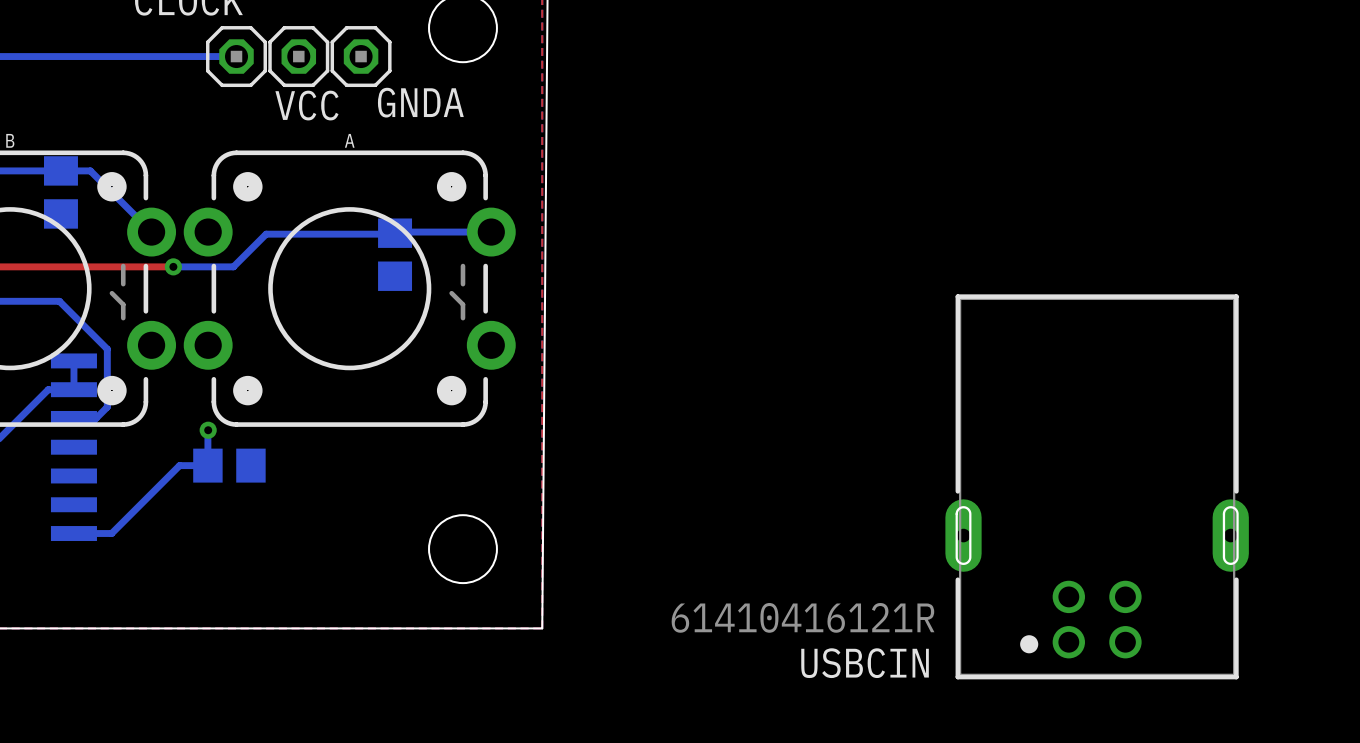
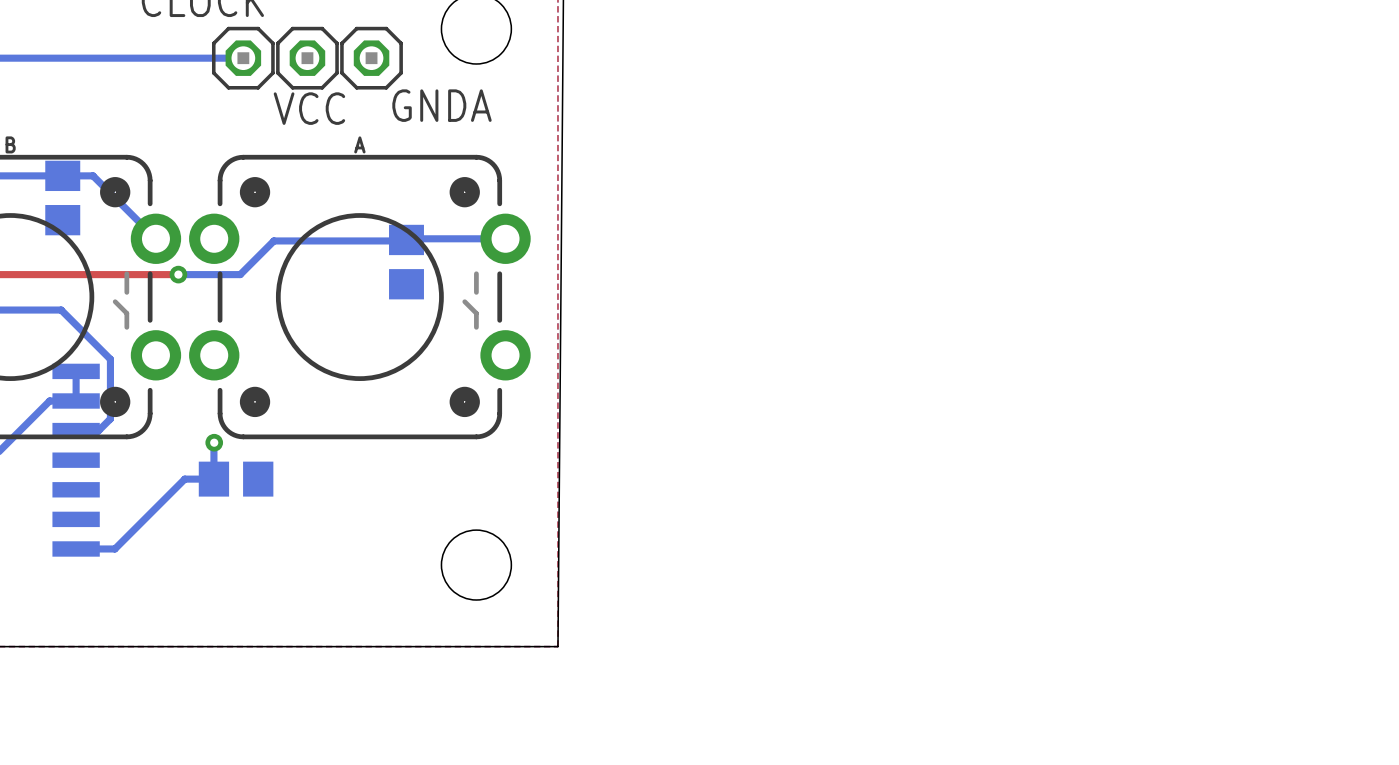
USBCIN: 61410416121R (1097, 486) -> none

